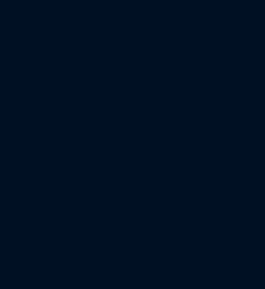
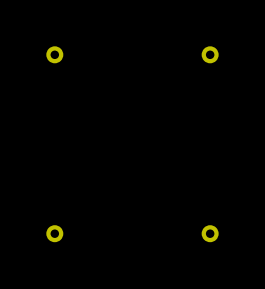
part: none -> (54, 54)
part: none -> (210, 54)
part: none -> (54, 233)
part: none -> (210, 233)

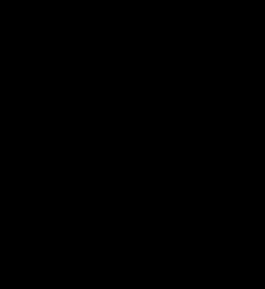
part: (54, 54) -> none
part: (210, 54) -> none
part: (54, 233) -> none
part: (210, 233) -> none

